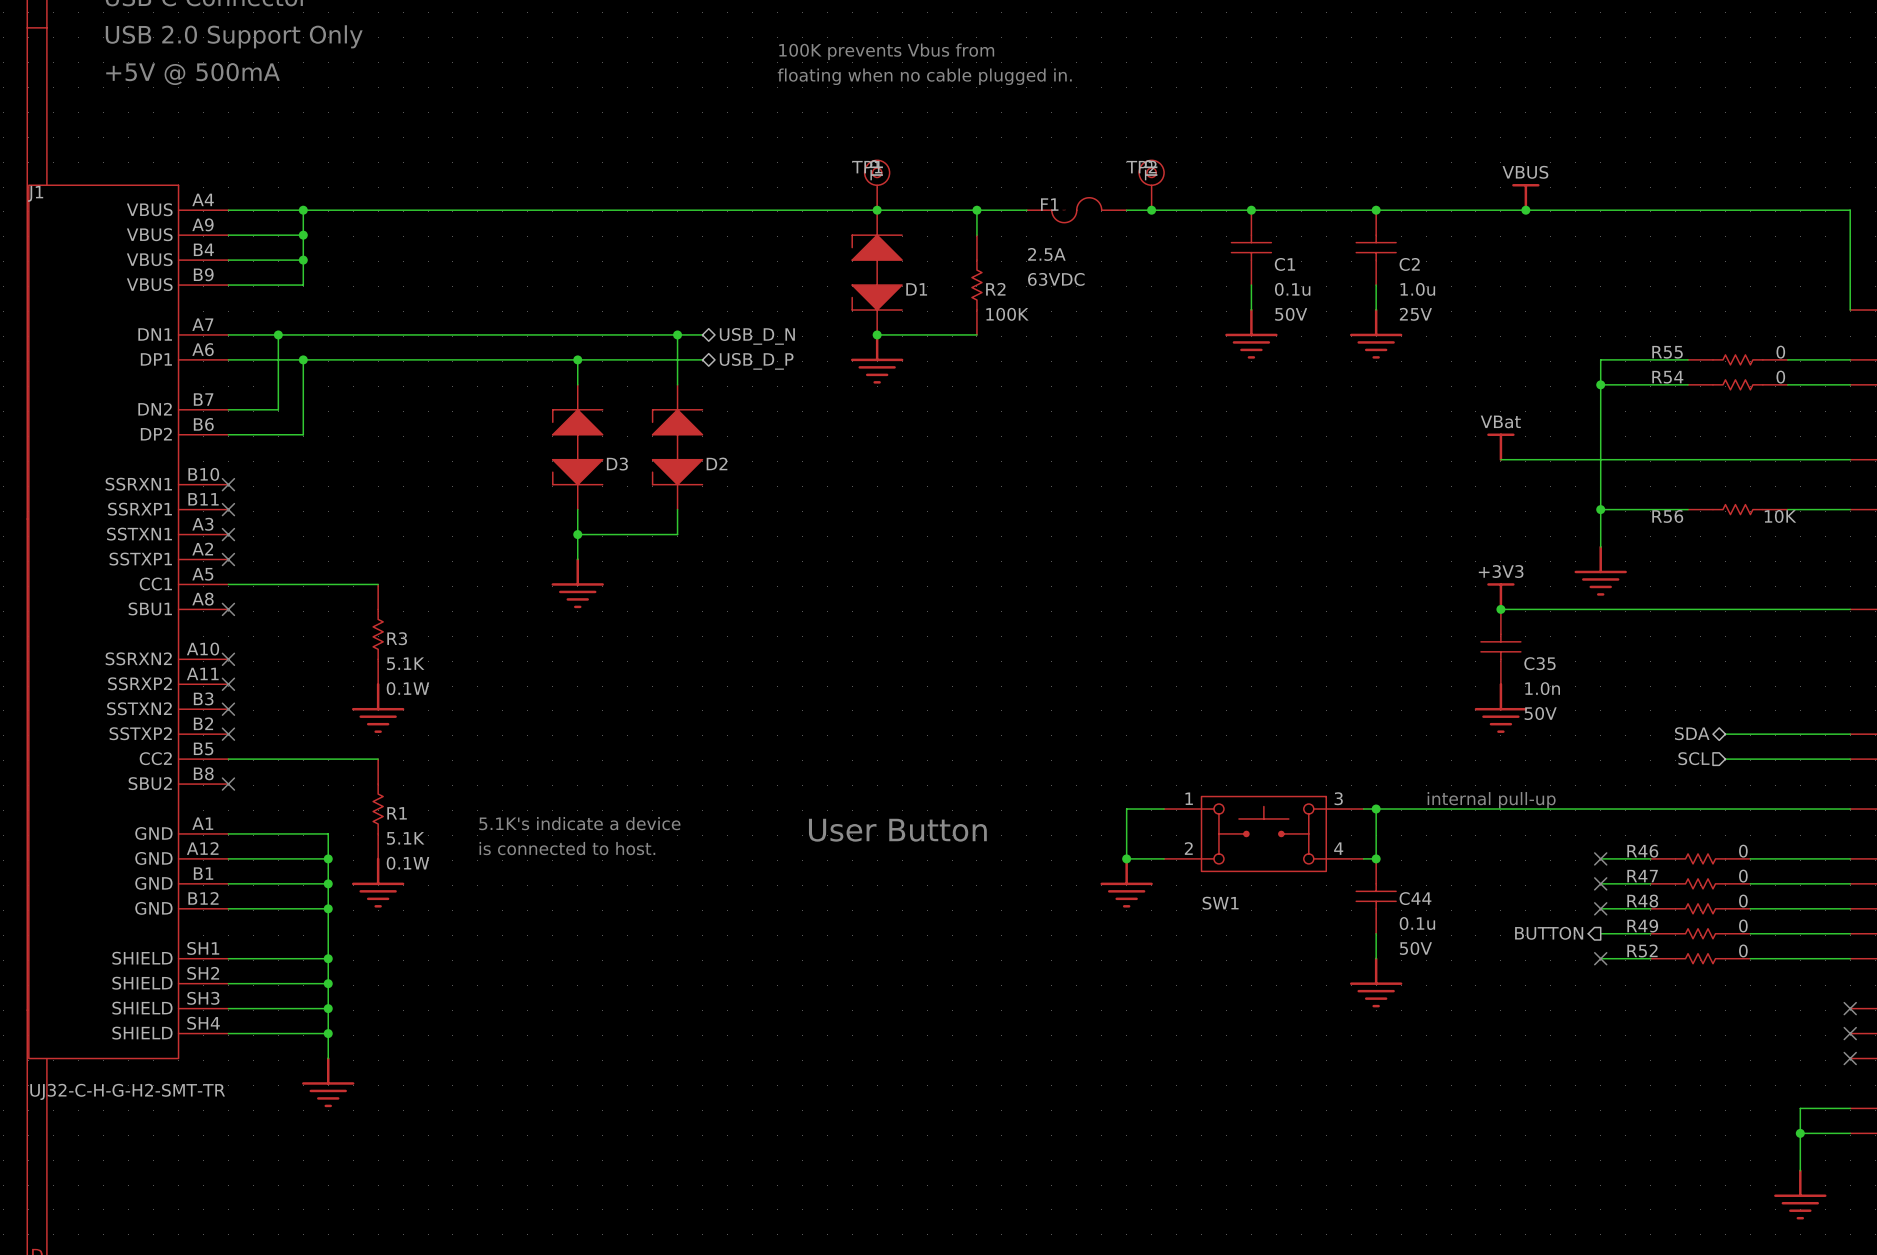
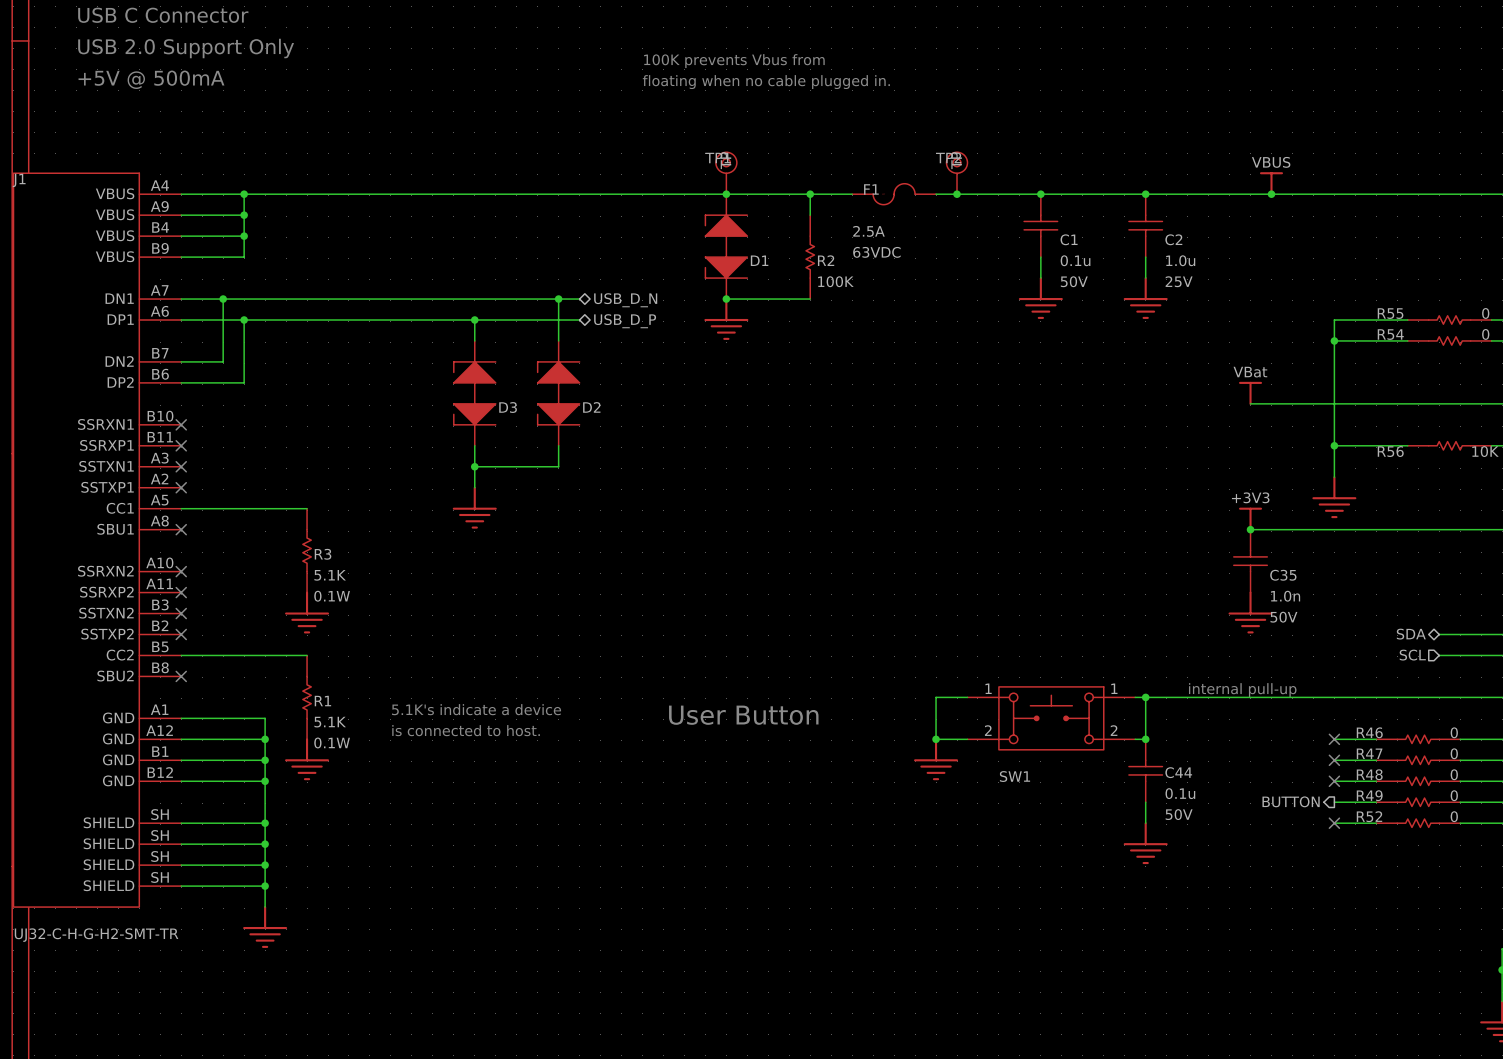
SW1 pin number: 3 (1338, 798) -> 1 (1114, 688)
SW1 pin number: 4 (1338, 848) -> 2 (1114, 730)
J1 pin number: SH1 (203, 948) -> SH (160, 814)
J1 pin number: SH2 (203, 973) -> SH (160, 835)
J1 pin number: SH3 (203, 998) -> SH (160, 856)
J1 pin number: SH4 (203, 1023) -> SH (160, 877)

